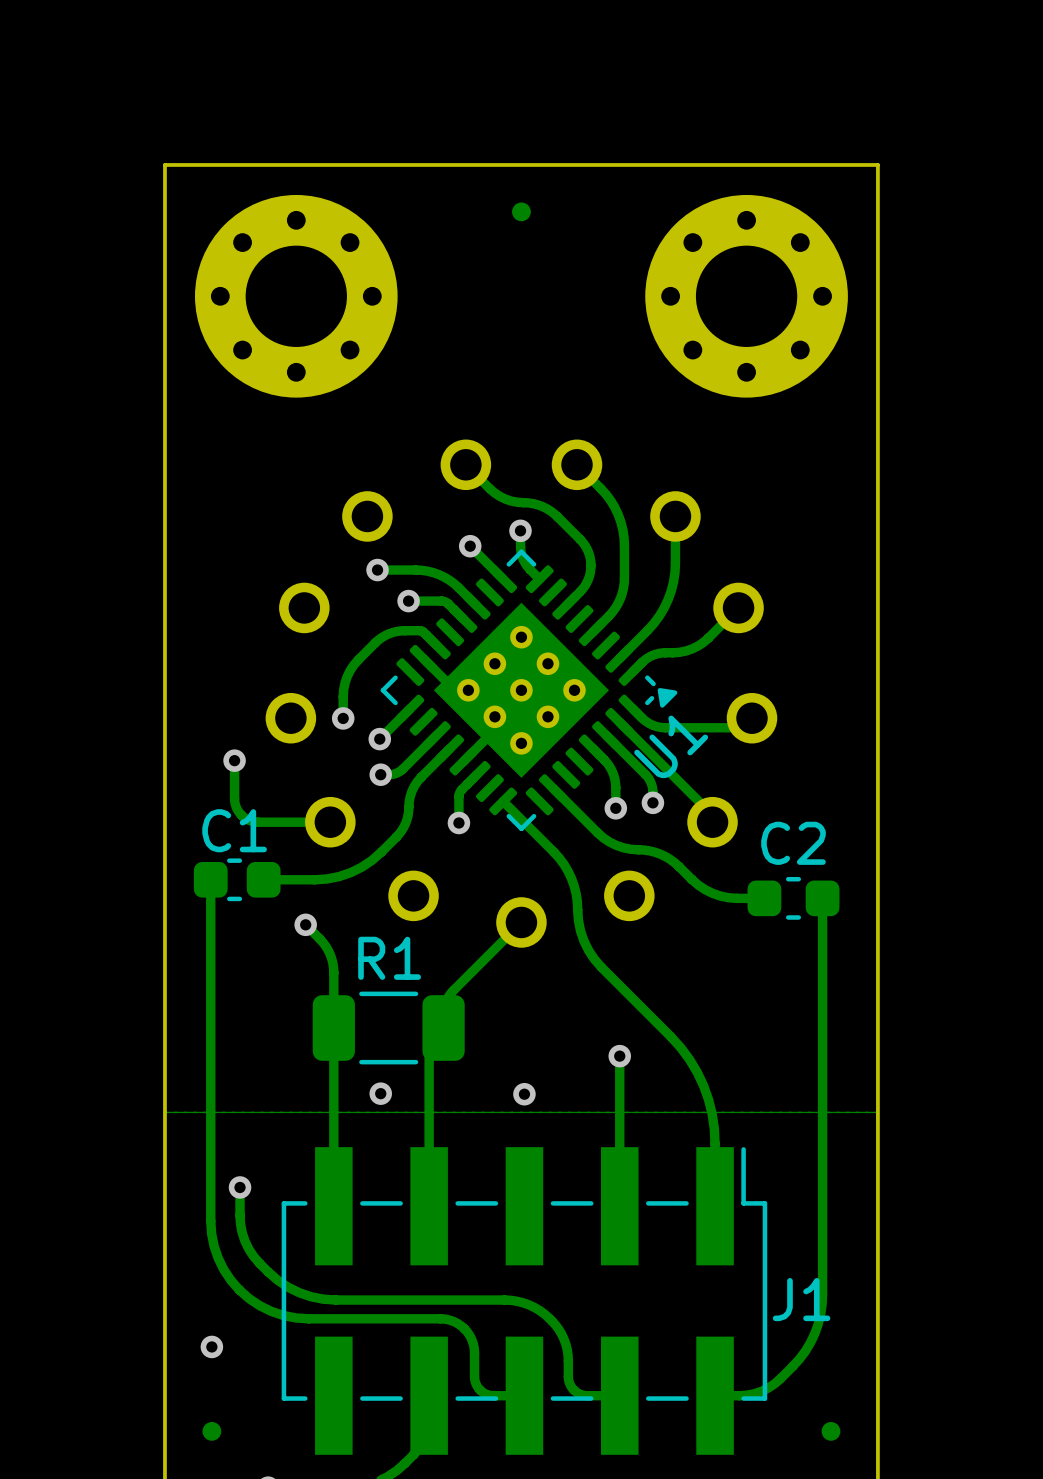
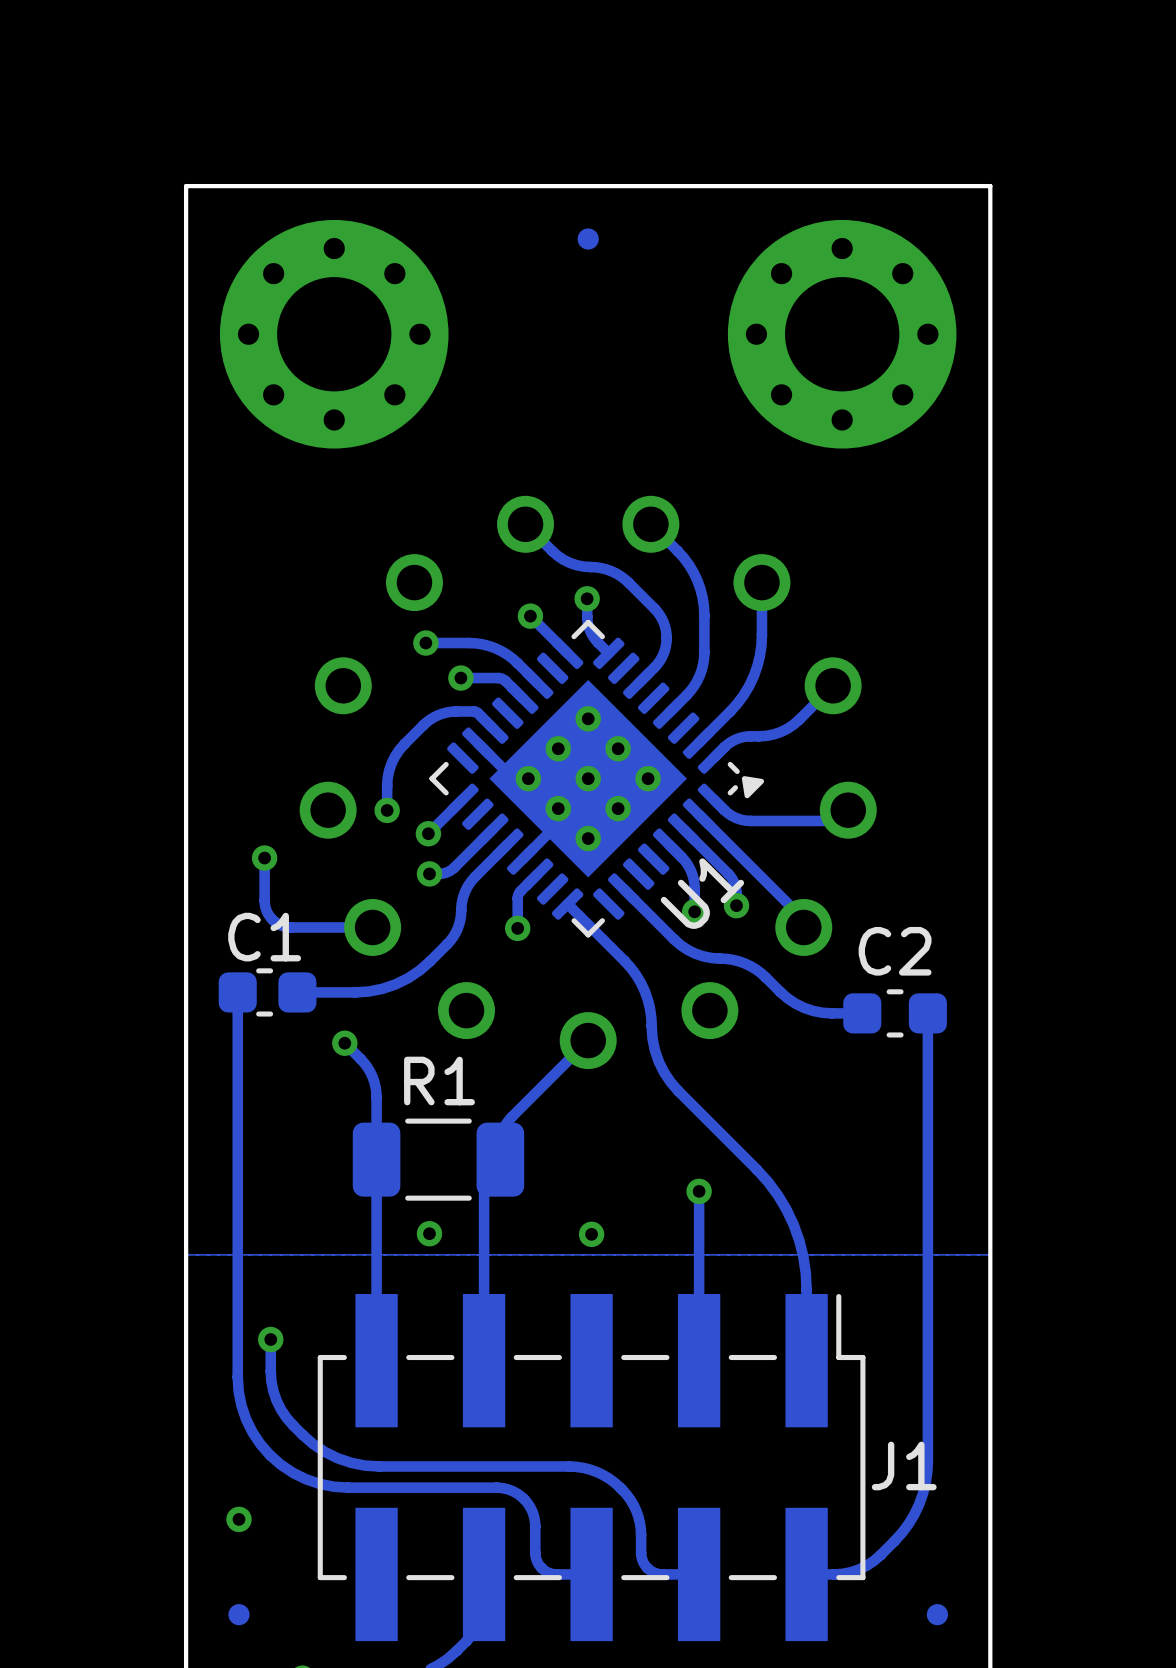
U1 name position: U1 (671, 746) -> U1 (702, 893)

